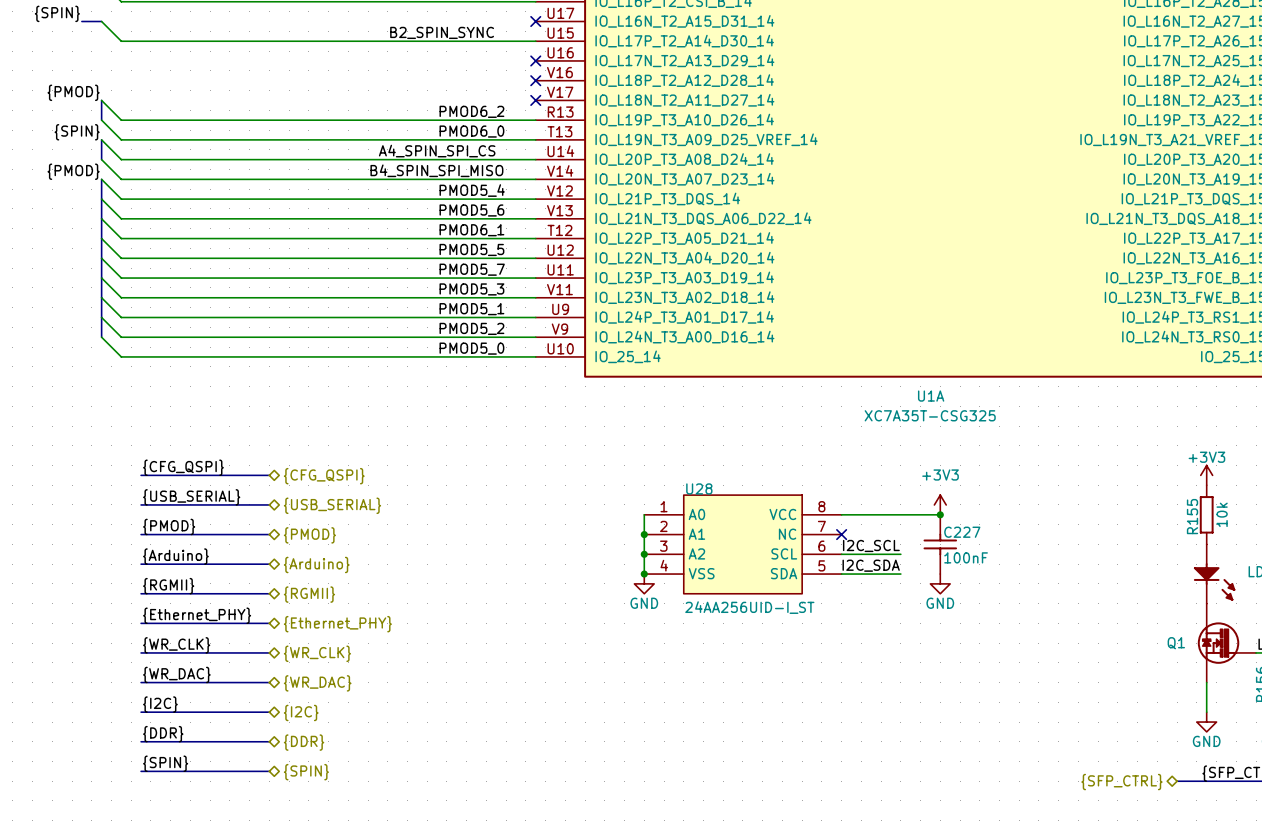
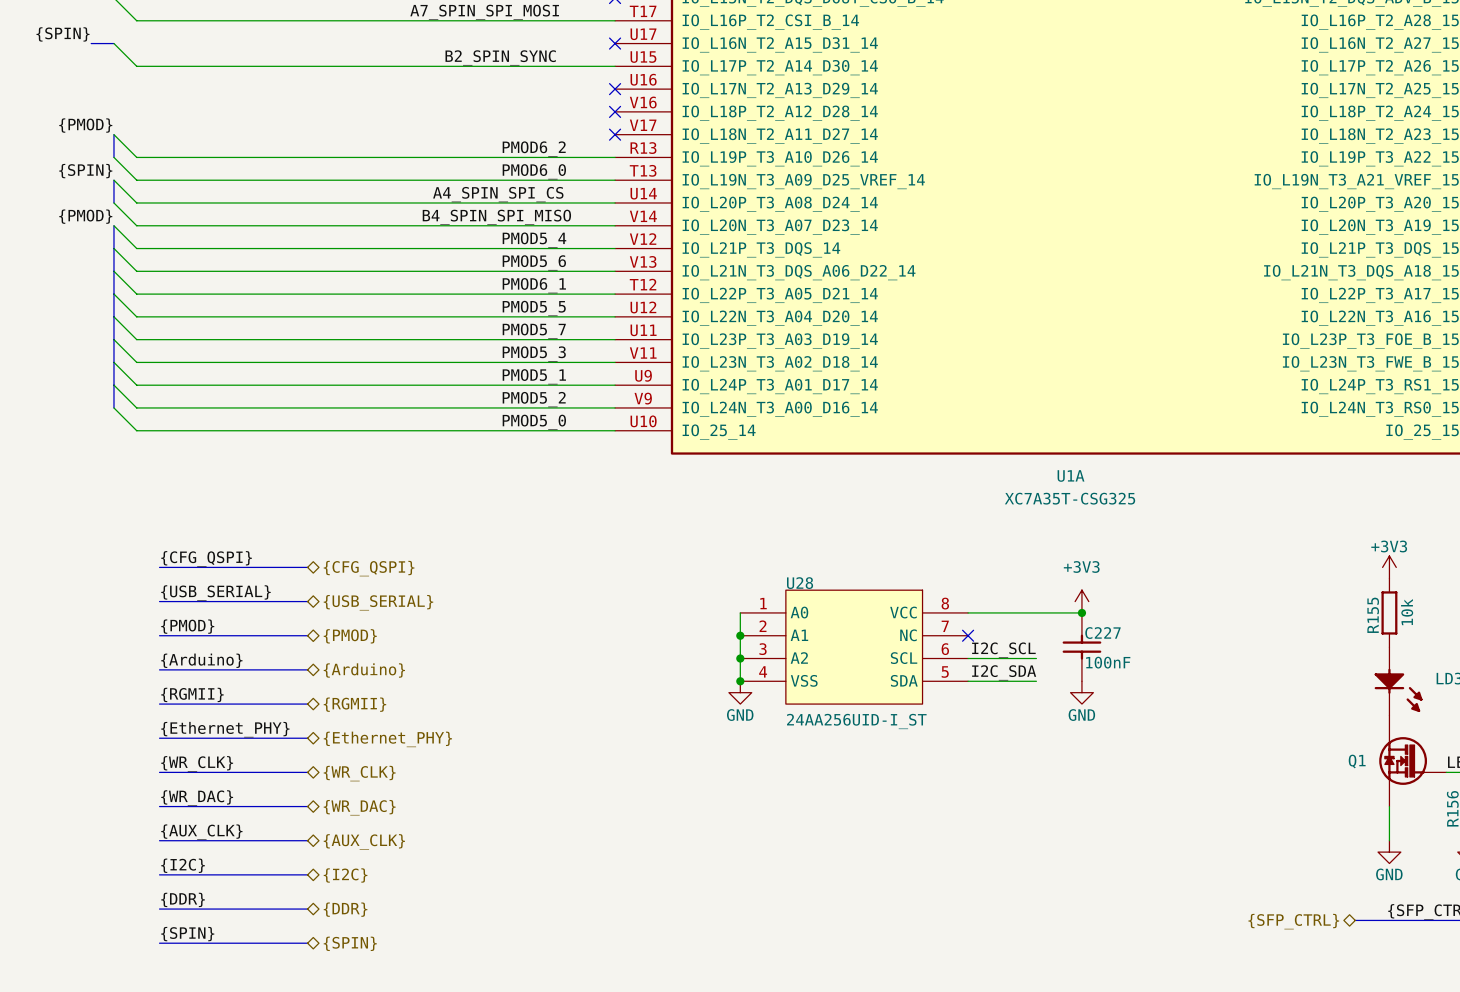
label: {I2C} (160, 704) -> {AUX_CLK} (201, 832)
hierarchical label: {I2C} (301, 712) -> {AUX_CLK} (364, 841)
label: {DDR} (163, 734) -> {I2C} (183, 865)
hierarchical label: {DDR} (304, 742) -> {I2C} (345, 875)
label: {SPIN} (165, 763) -> {DDR} (183, 899)
hierarchical label: {SPIN} (306, 772) -> {DDR} (345, 909)
label: none -> {SPIN} (187, 934)
bus: none -> (159, 943) (307, 943)
hierarchical label: none -> {SPIN} (350, 943)

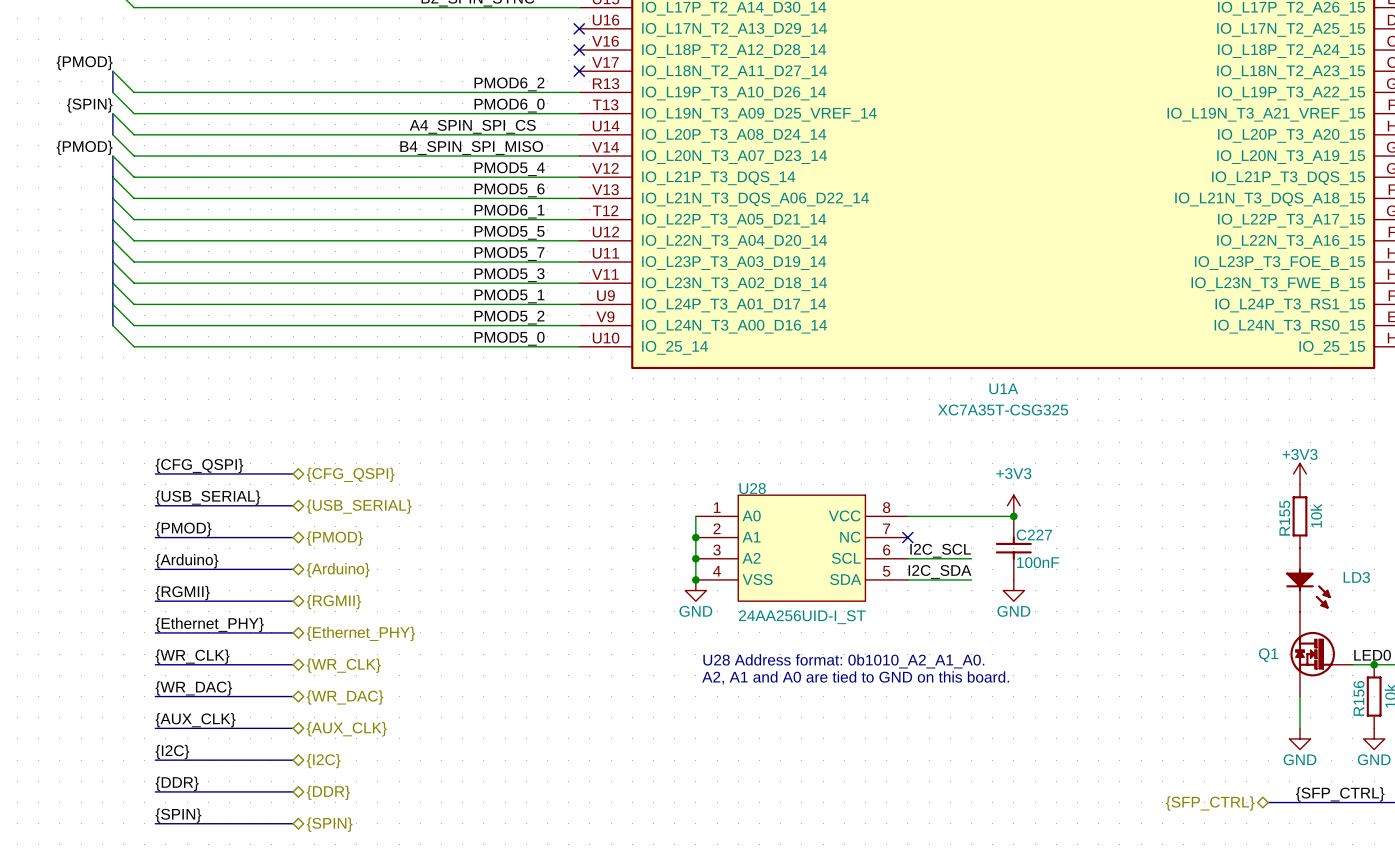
text: none -> U28 Address format: 0b1010_A2_A1_A0. (843, 661)
text: none -> A2, A1 and A0 are tied to GND on this board. (855, 677)

